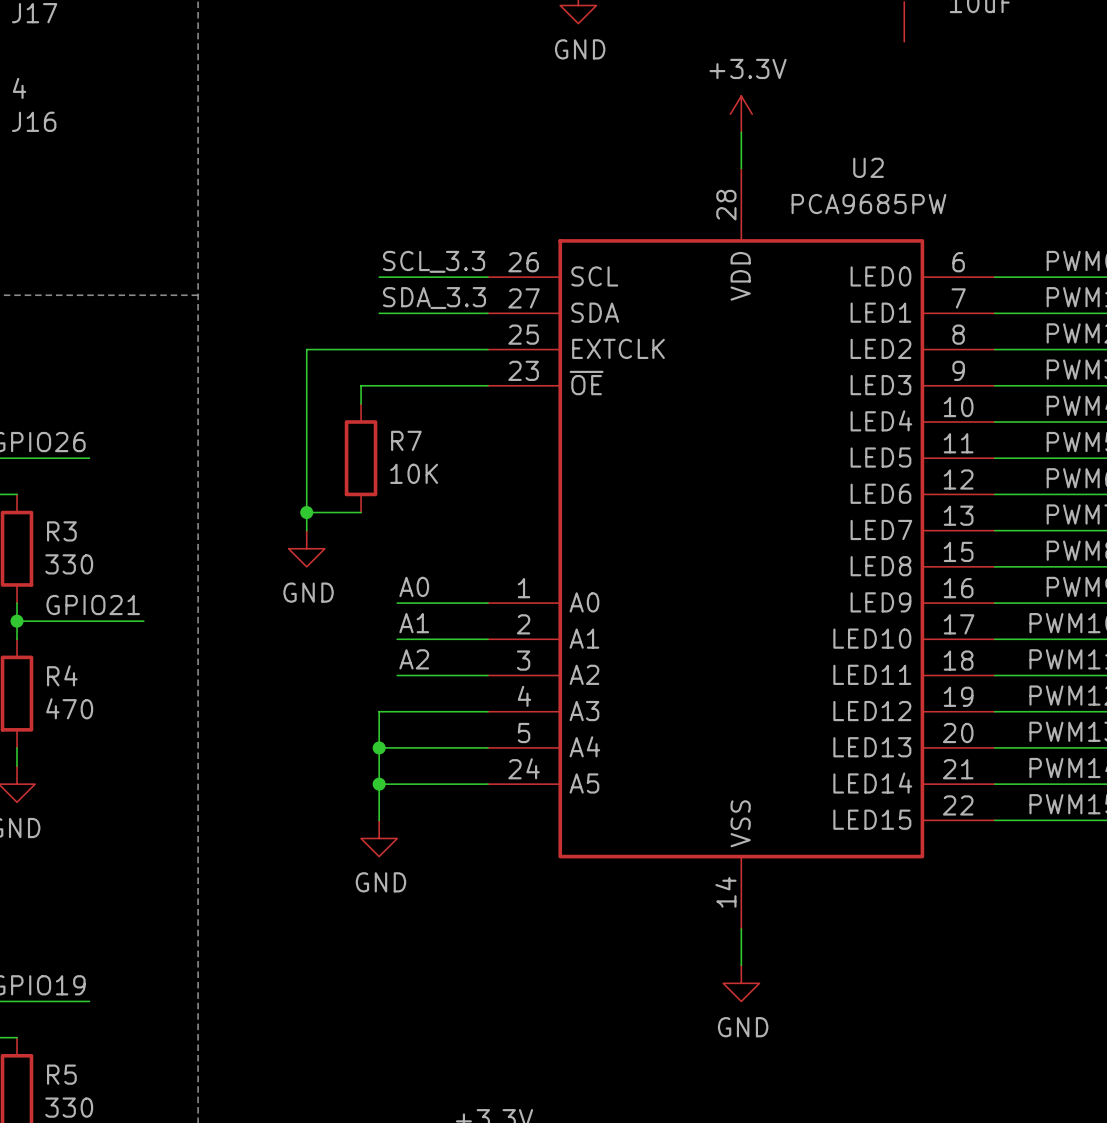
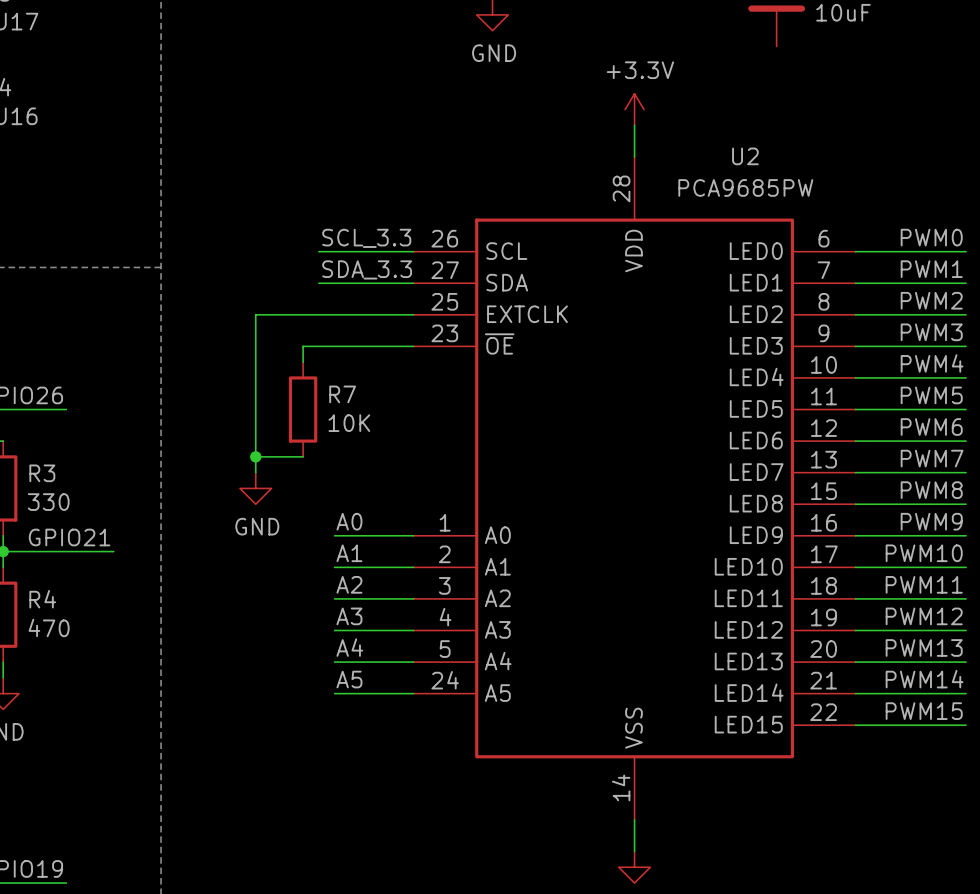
label: none -> A3 (349, 616)
wire: (397, 711) (379, 711) (379, 820) -> none
label: none -> A4 (349, 647)
wire: (379, 747) (397, 747) -> none
junction: (379, 747) -> none
label: none -> A5 (349, 679)
wire: (379, 784) (397, 784) -> none
junction: (379, 784) -> none
power symbol: GND (379, 838) -> none

